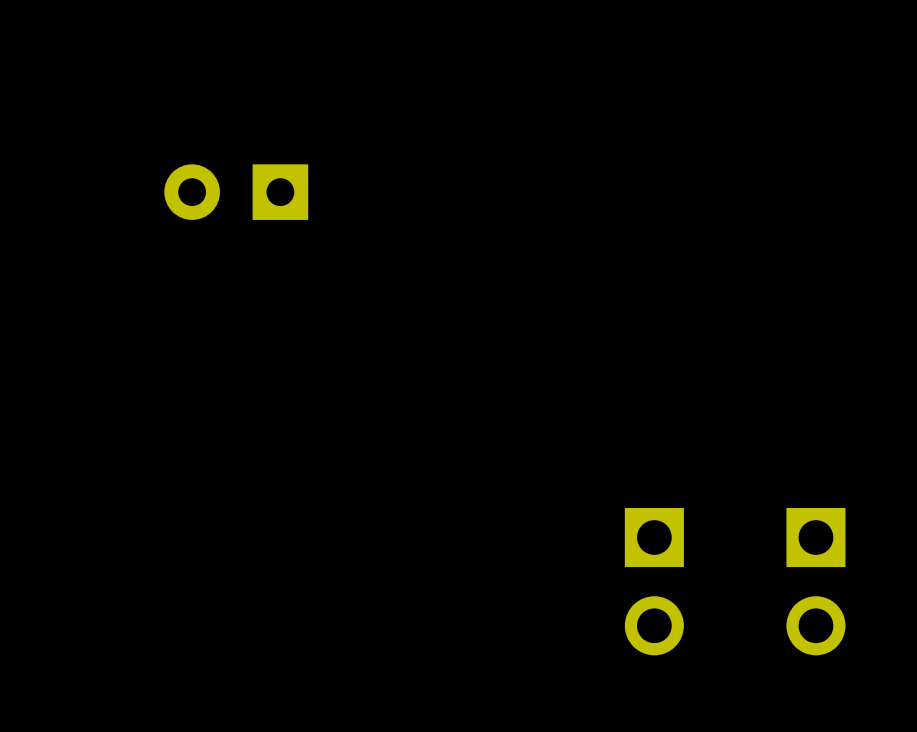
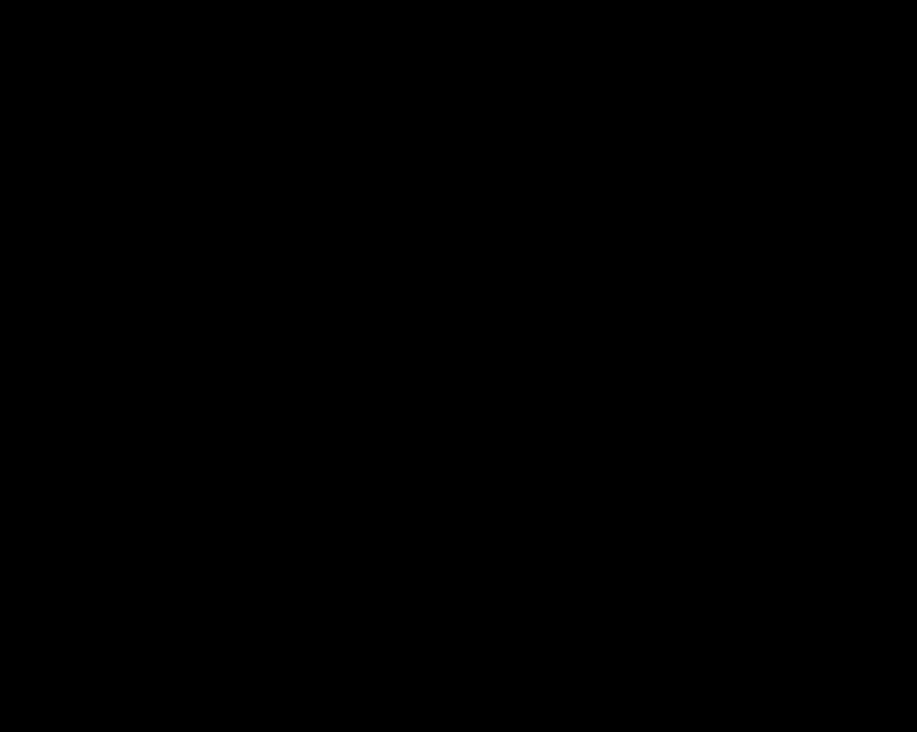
part: (236, 192) -> none
part: (654, 581) -> none
part: (815, 581) -> none

